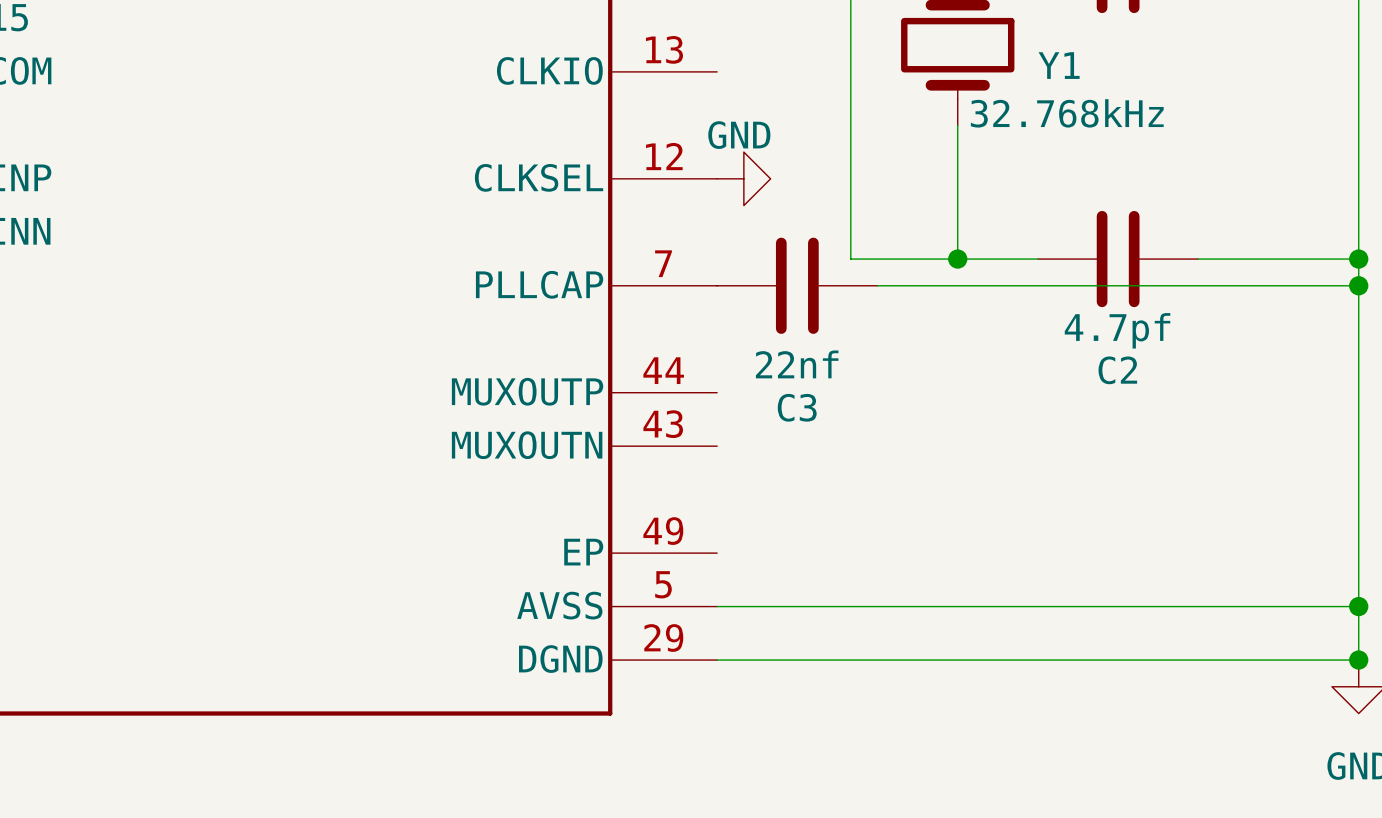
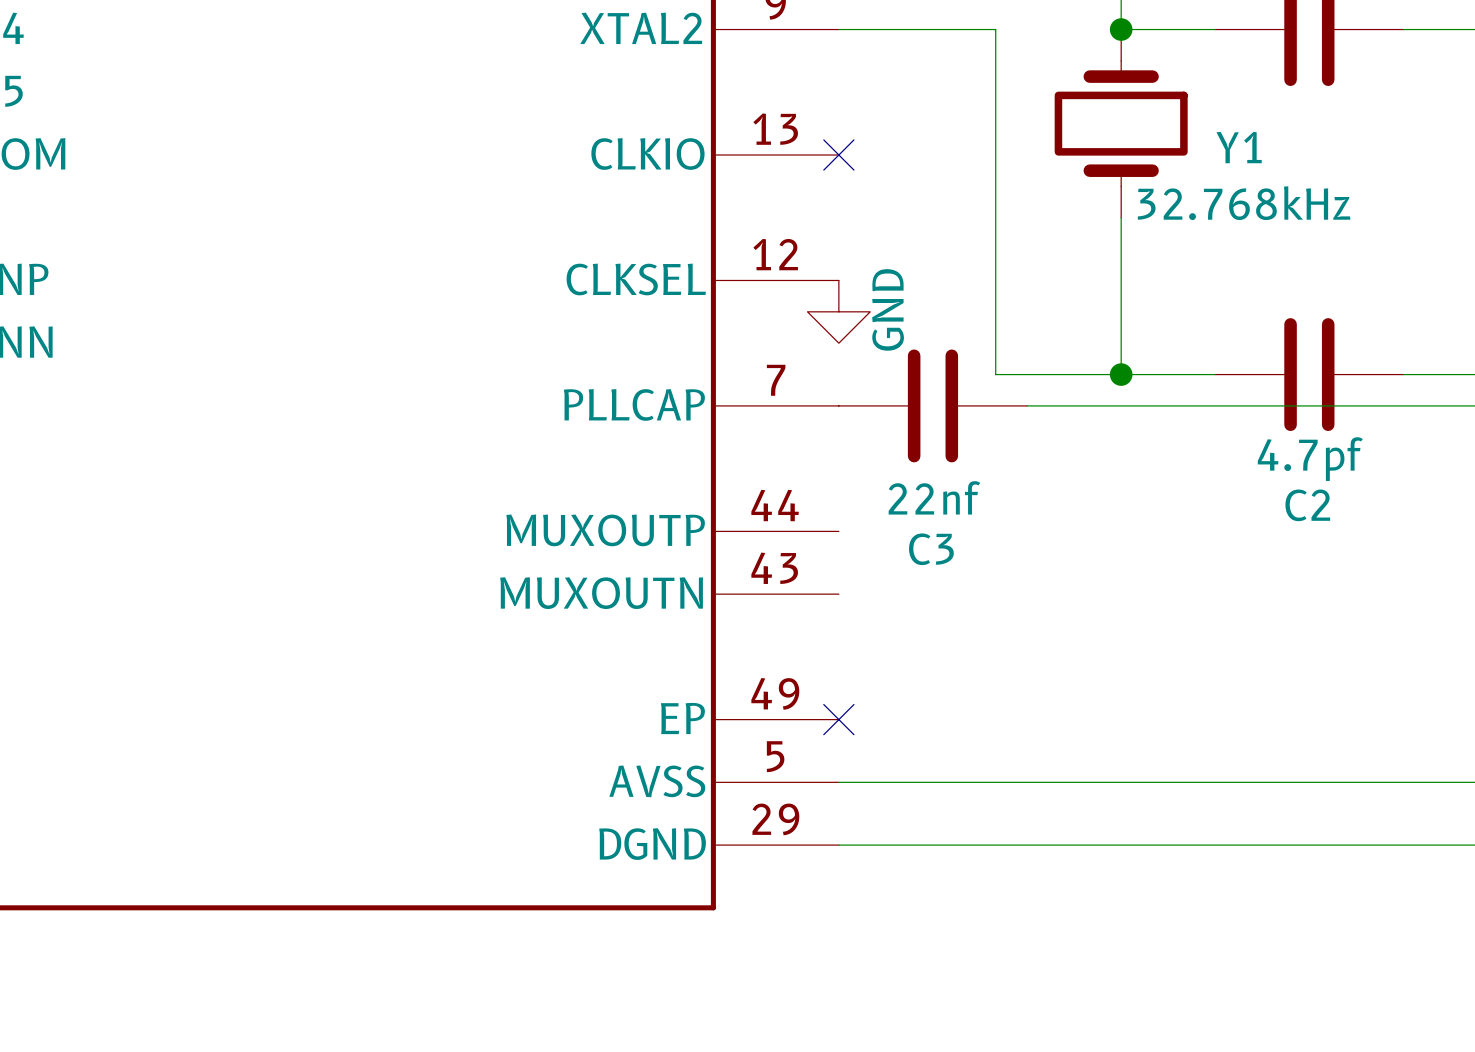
no-connect mark: none -> (838, 155)
power symbol rotation: 0° (743, 178) -> 90° clockwise (838, 311)
power symbol position: GND (743, 178) -> GND (838, 311)
no-connect mark: none -> (838, 719)

